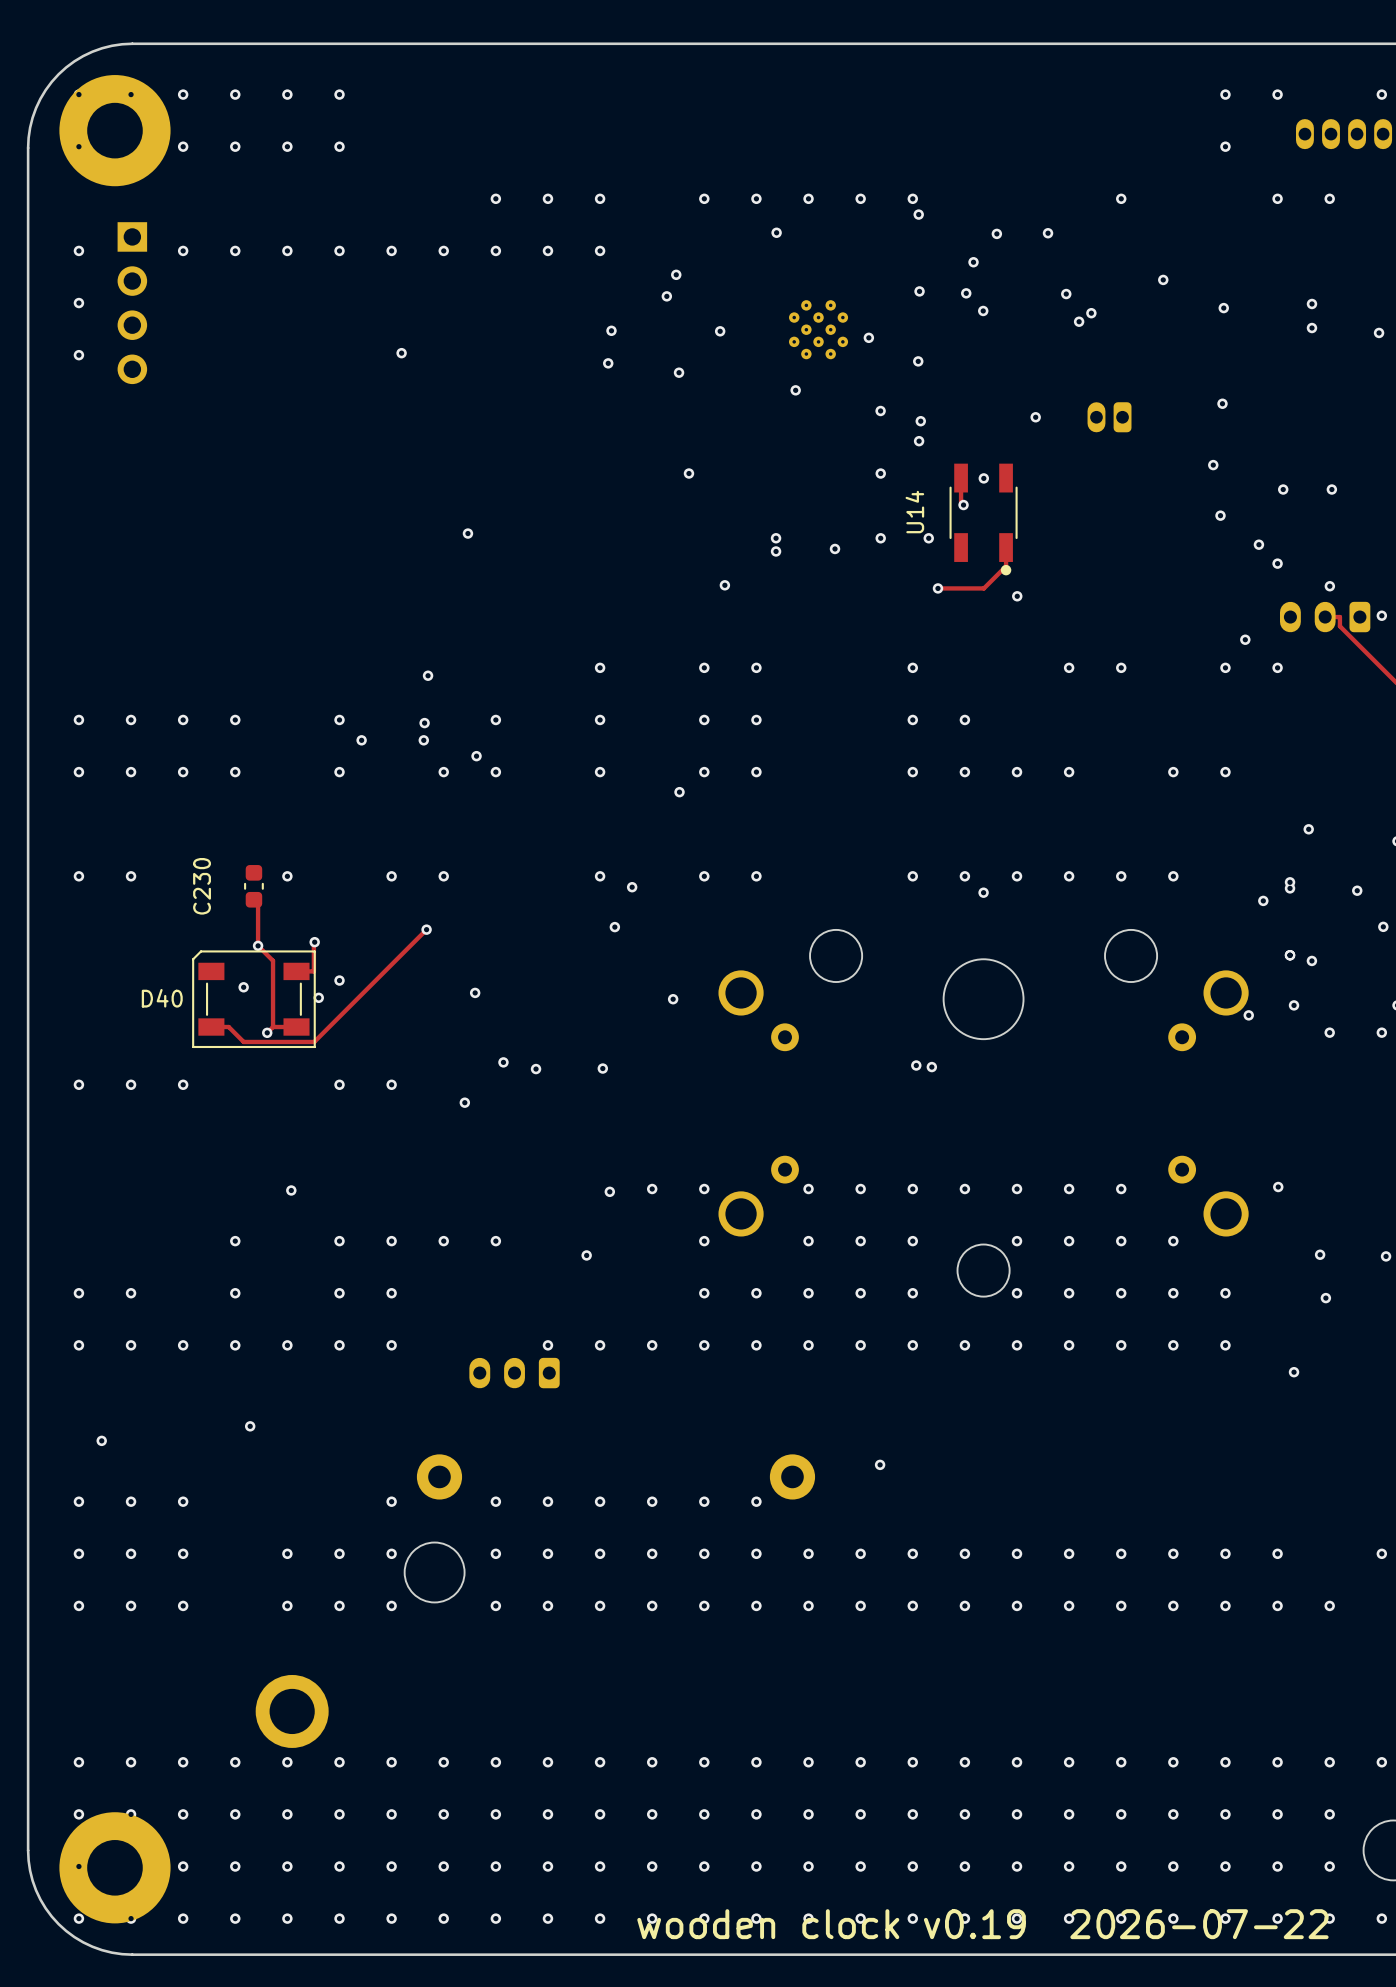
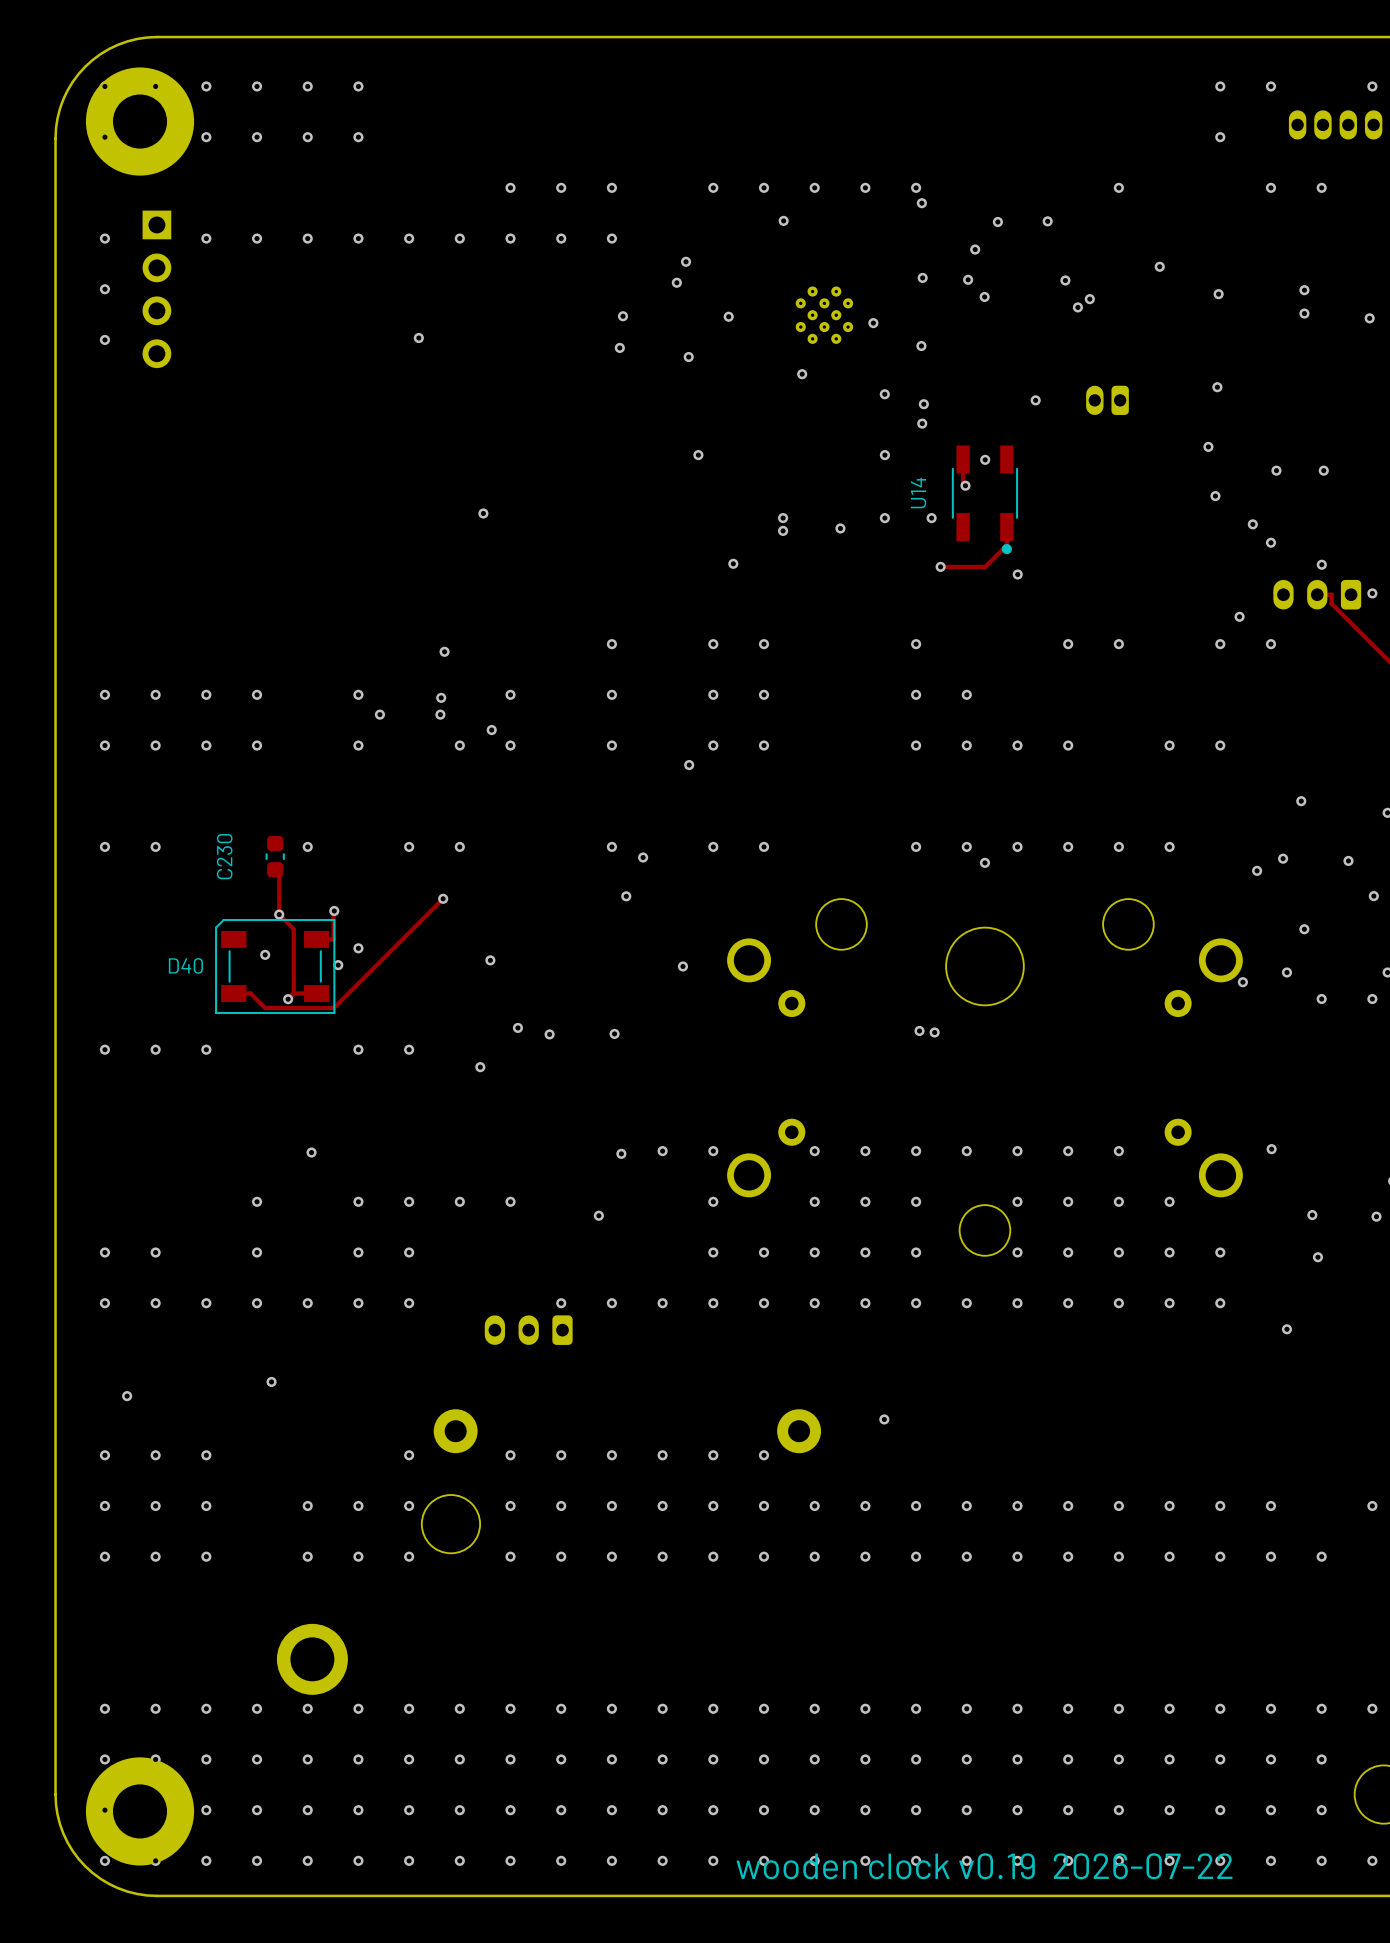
via: (1290, 882) -> none
via: (1290, 955) -> none

